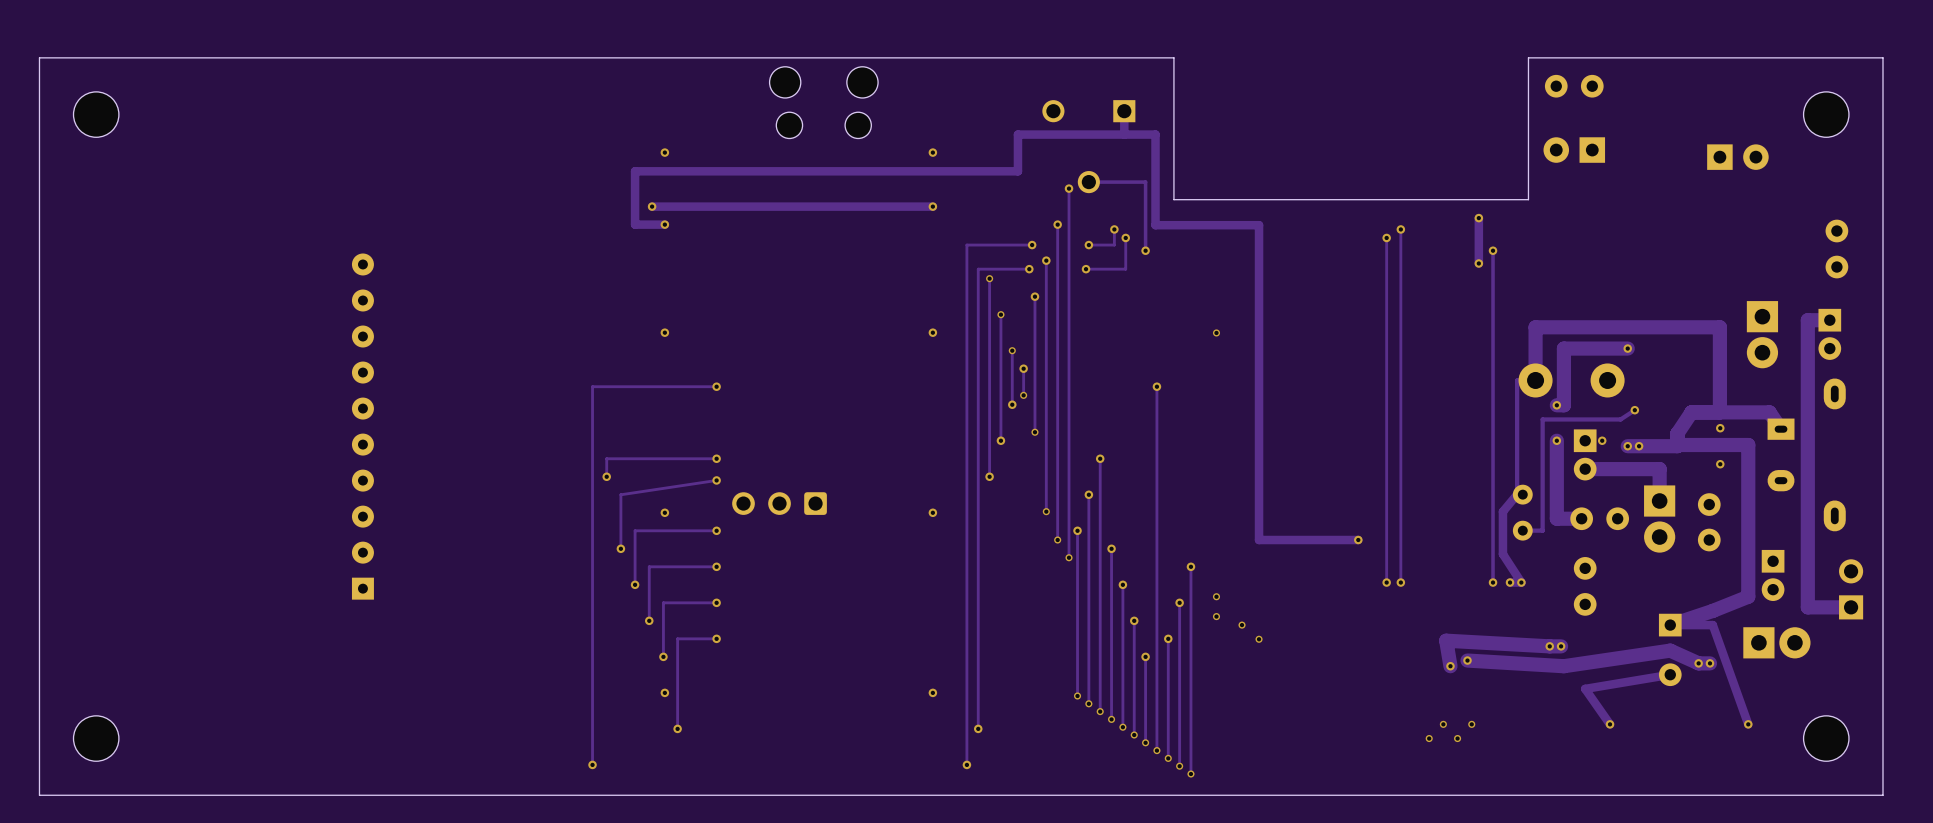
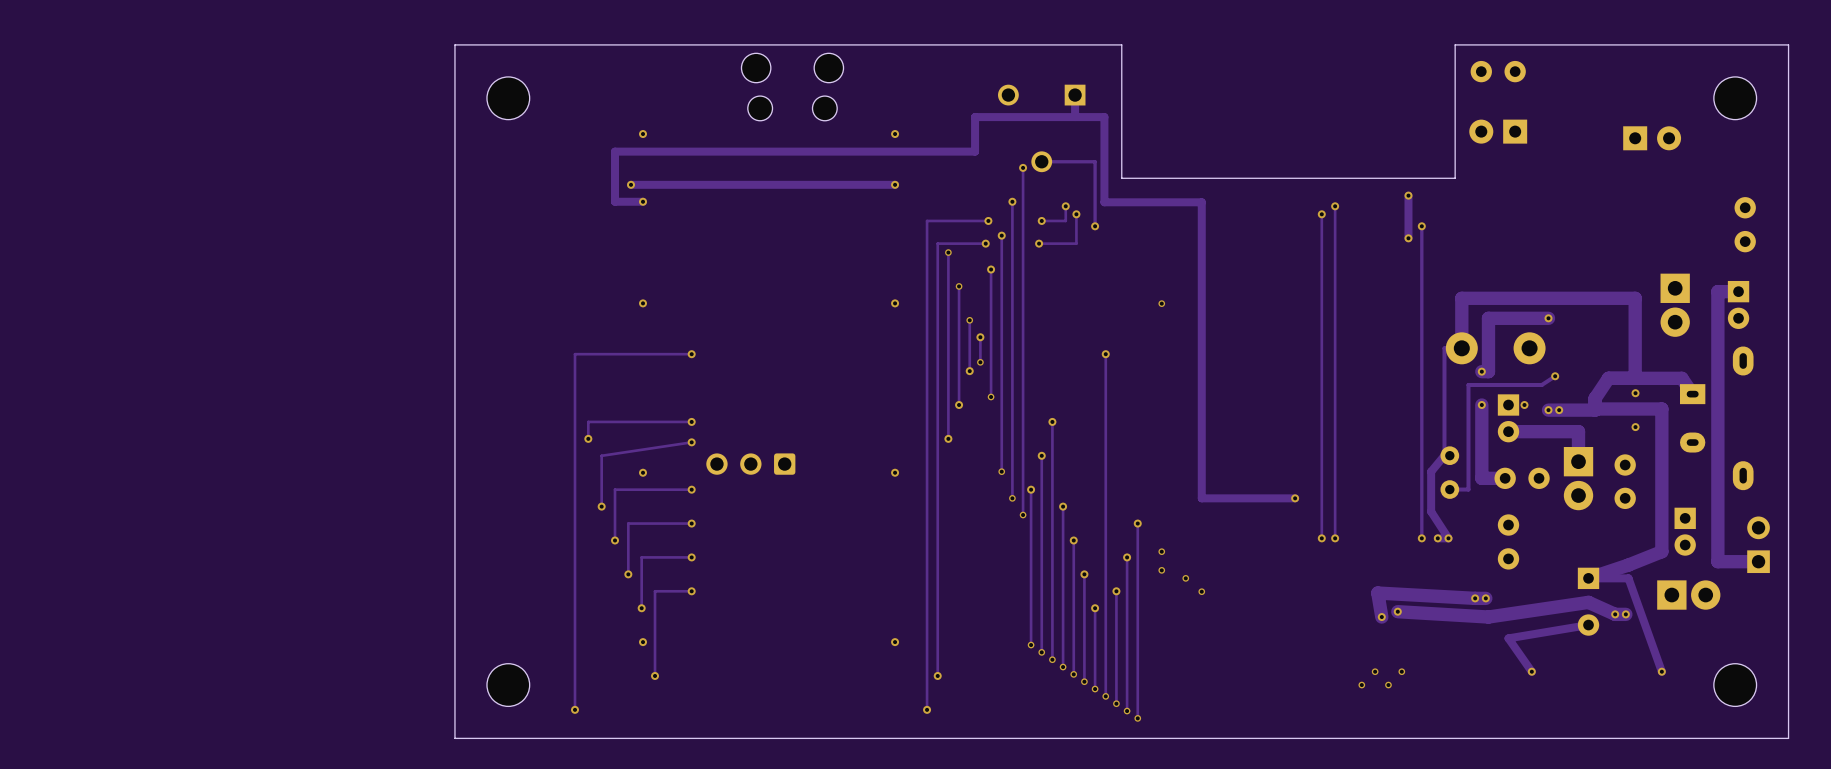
board edge: (464, 57) (39, 57) (39, 795) (464, 795) -> (454, 44) (454, 738)
part: (96, 114) -> none
part: none -> (508, 98)
part: (362, 426) -> none
part: (96, 738) -> none
part: none -> (508, 685)

